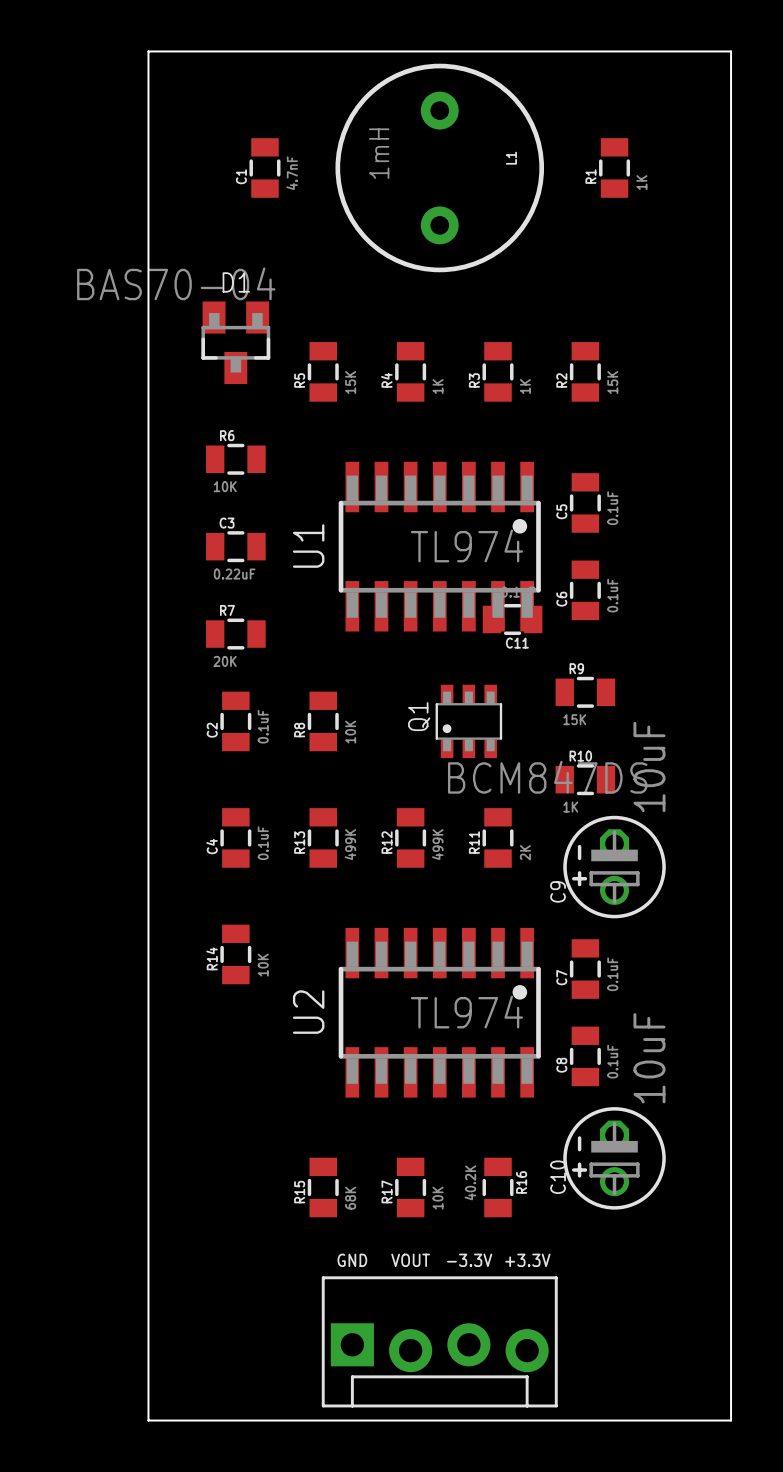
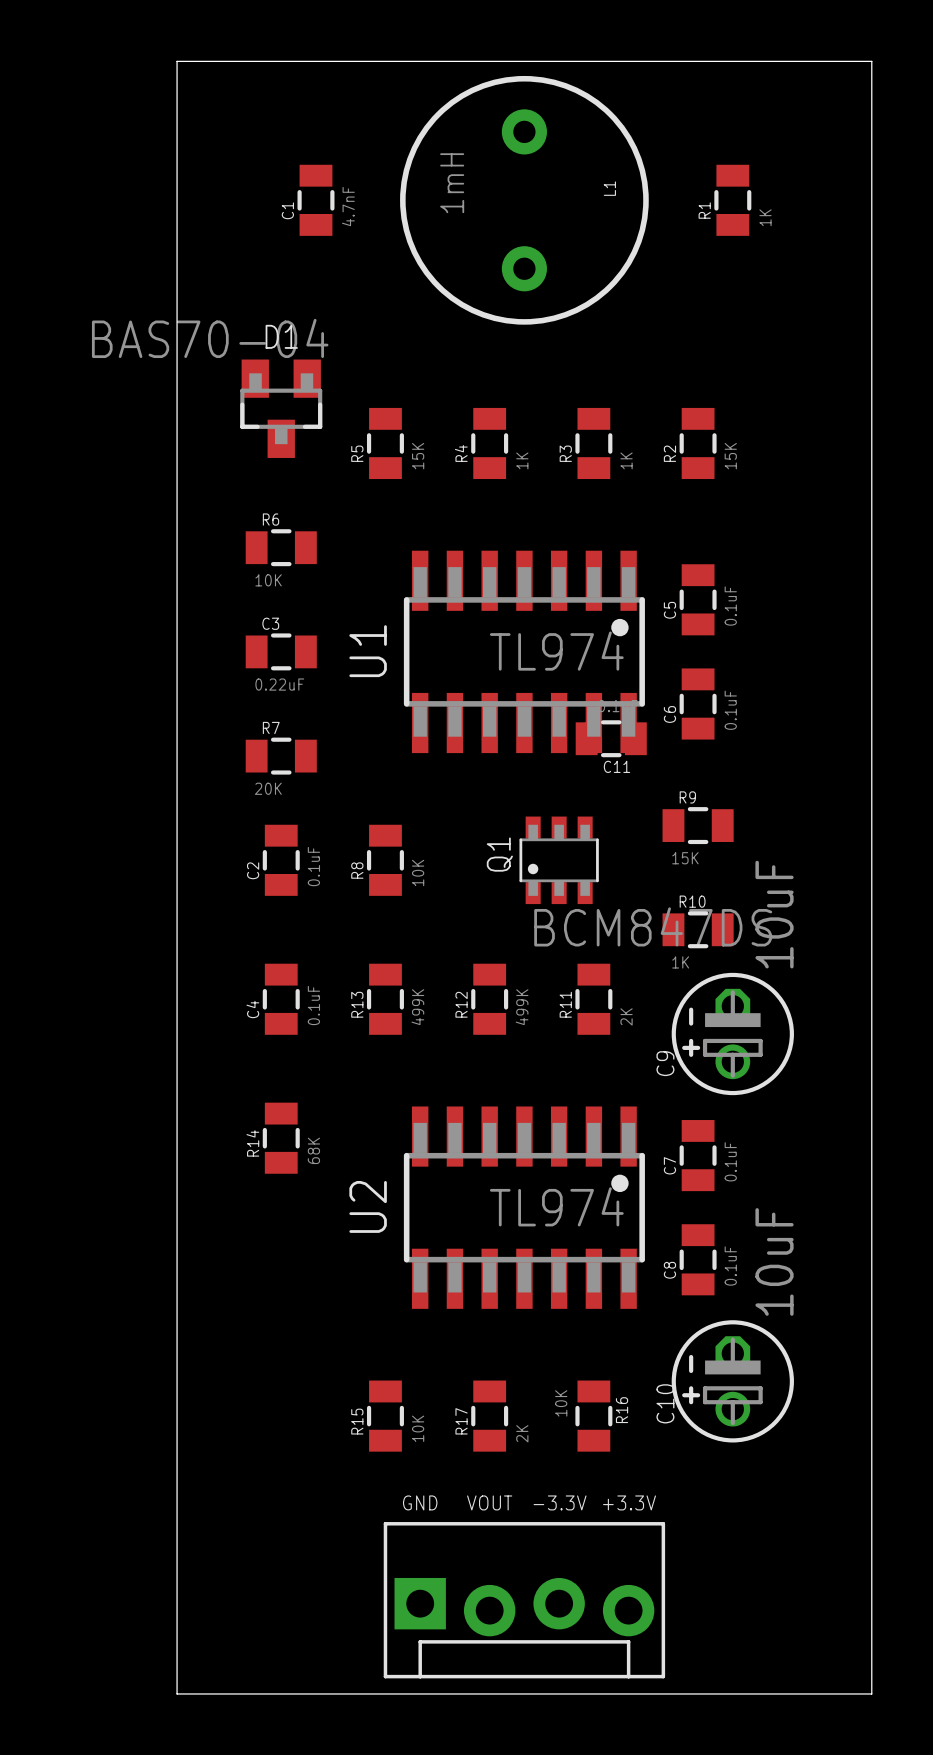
R14 value: 10K (263, 965) -> 68K (313, 1150)
R16 value: 40.2K (470, 1182) -> 10K (561, 1403)
R15 value: 68K (350, 1198) -> 10K (418, 1428)
R17 value: 10K (438, 1198) -> 2K (522, 1433)

